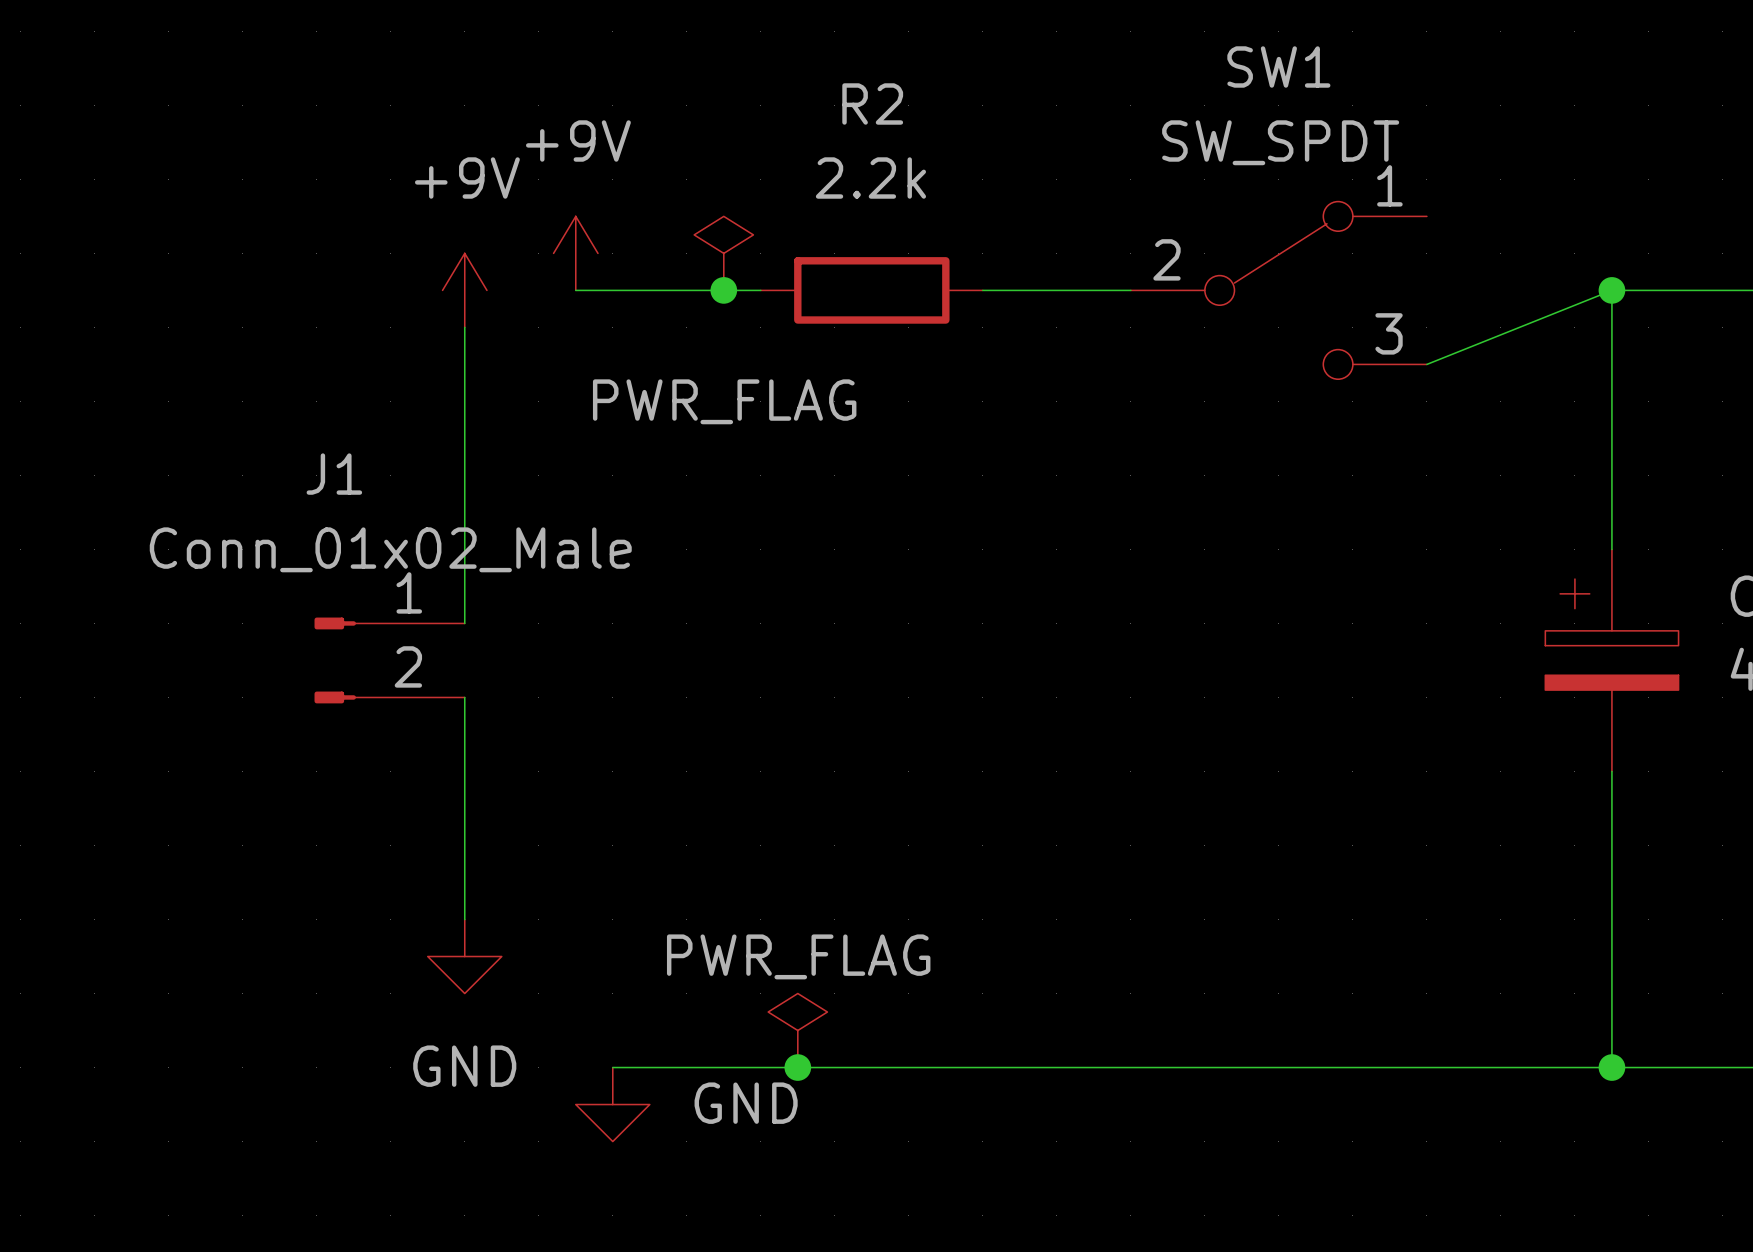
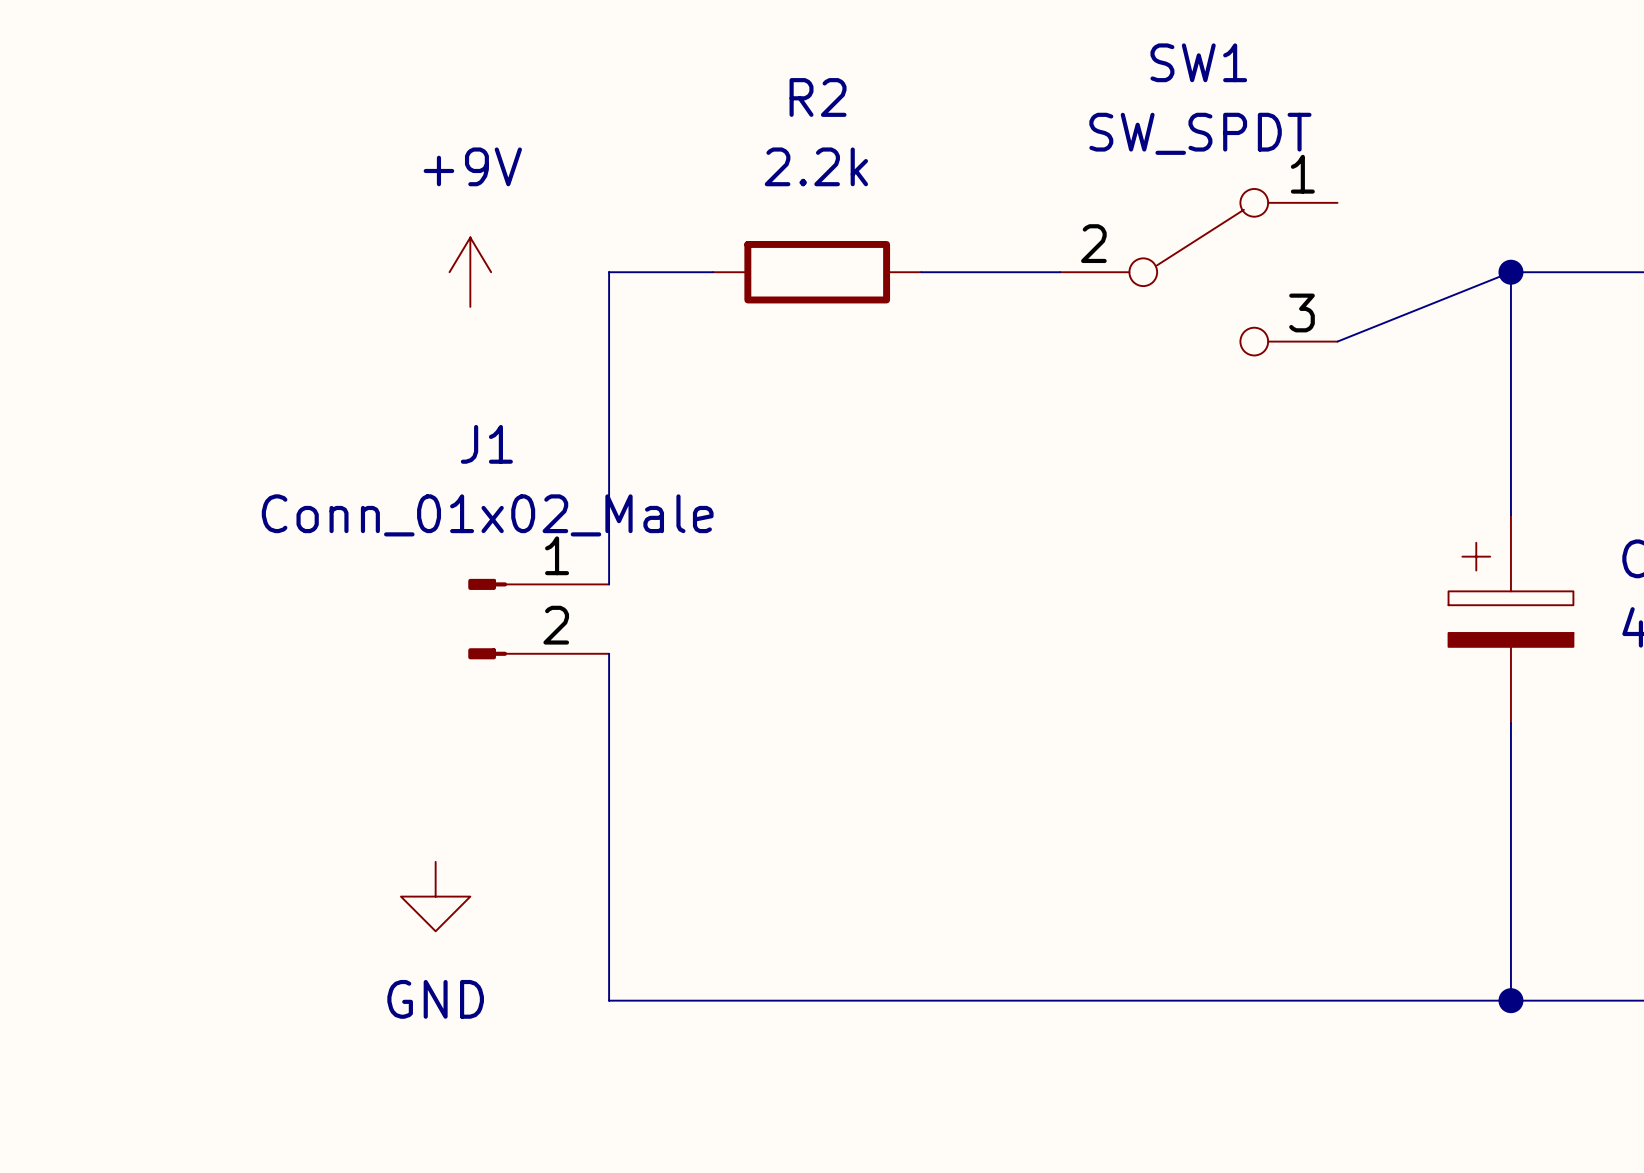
power symbol: +9V (575, 253) -> none
power symbol: PWR_FLAG (723, 253) -> none
power symbol position: +9V (464, 290) -> +9V (470, 272)
wire: (575, 290) (649, 290) -> (609, 584) (609, 272)
junction: (723, 290) -> none
wire: (464, 327) (464, 623) -> none
J1 value position: Conn_01x02_Male (390, 549) -> Conn_01x02_Male (487, 515)
J1 position: (389, 660) -> (538, 619)
wire: (464, 697) (464, 919) -> none
power symbol: PWR_FLAG (797, 1030) -> none
wire: (612, 1067) (649, 1067) -> (609, 653) (609, 1000)
junction: (797, 1067) -> none
power symbol: GND (612, 1104) -> none

